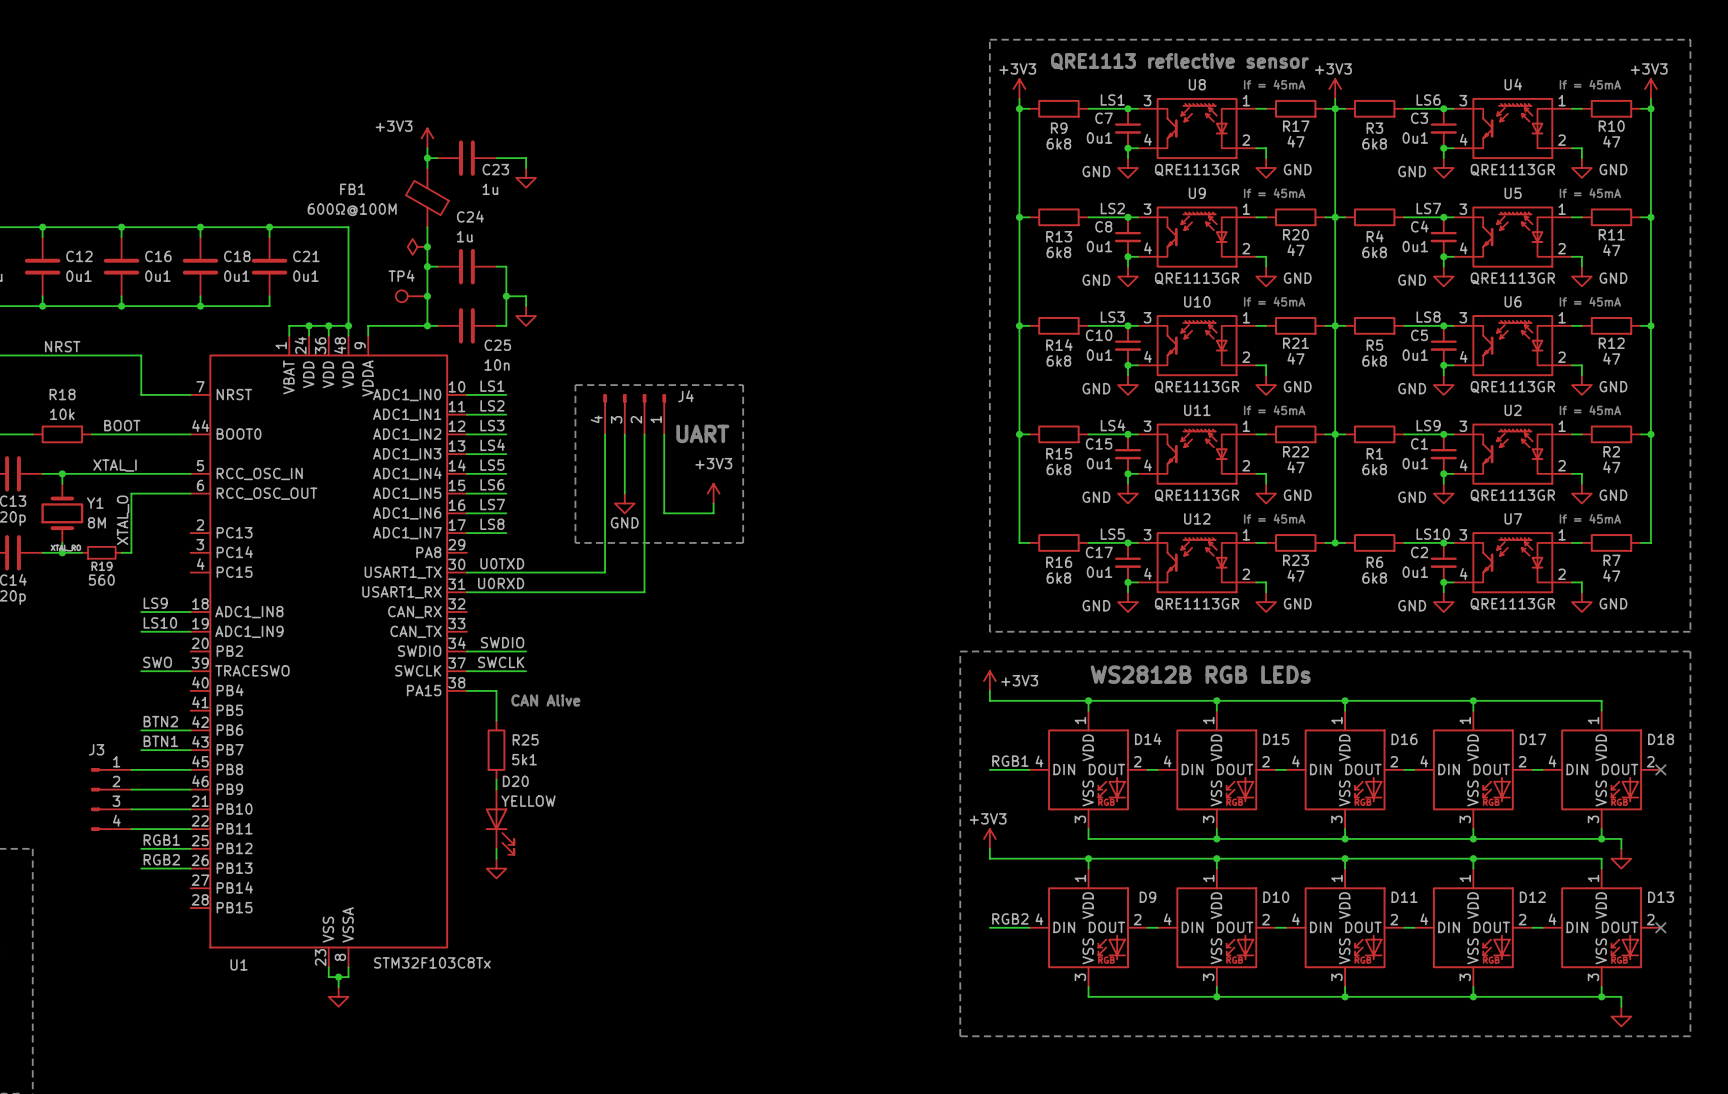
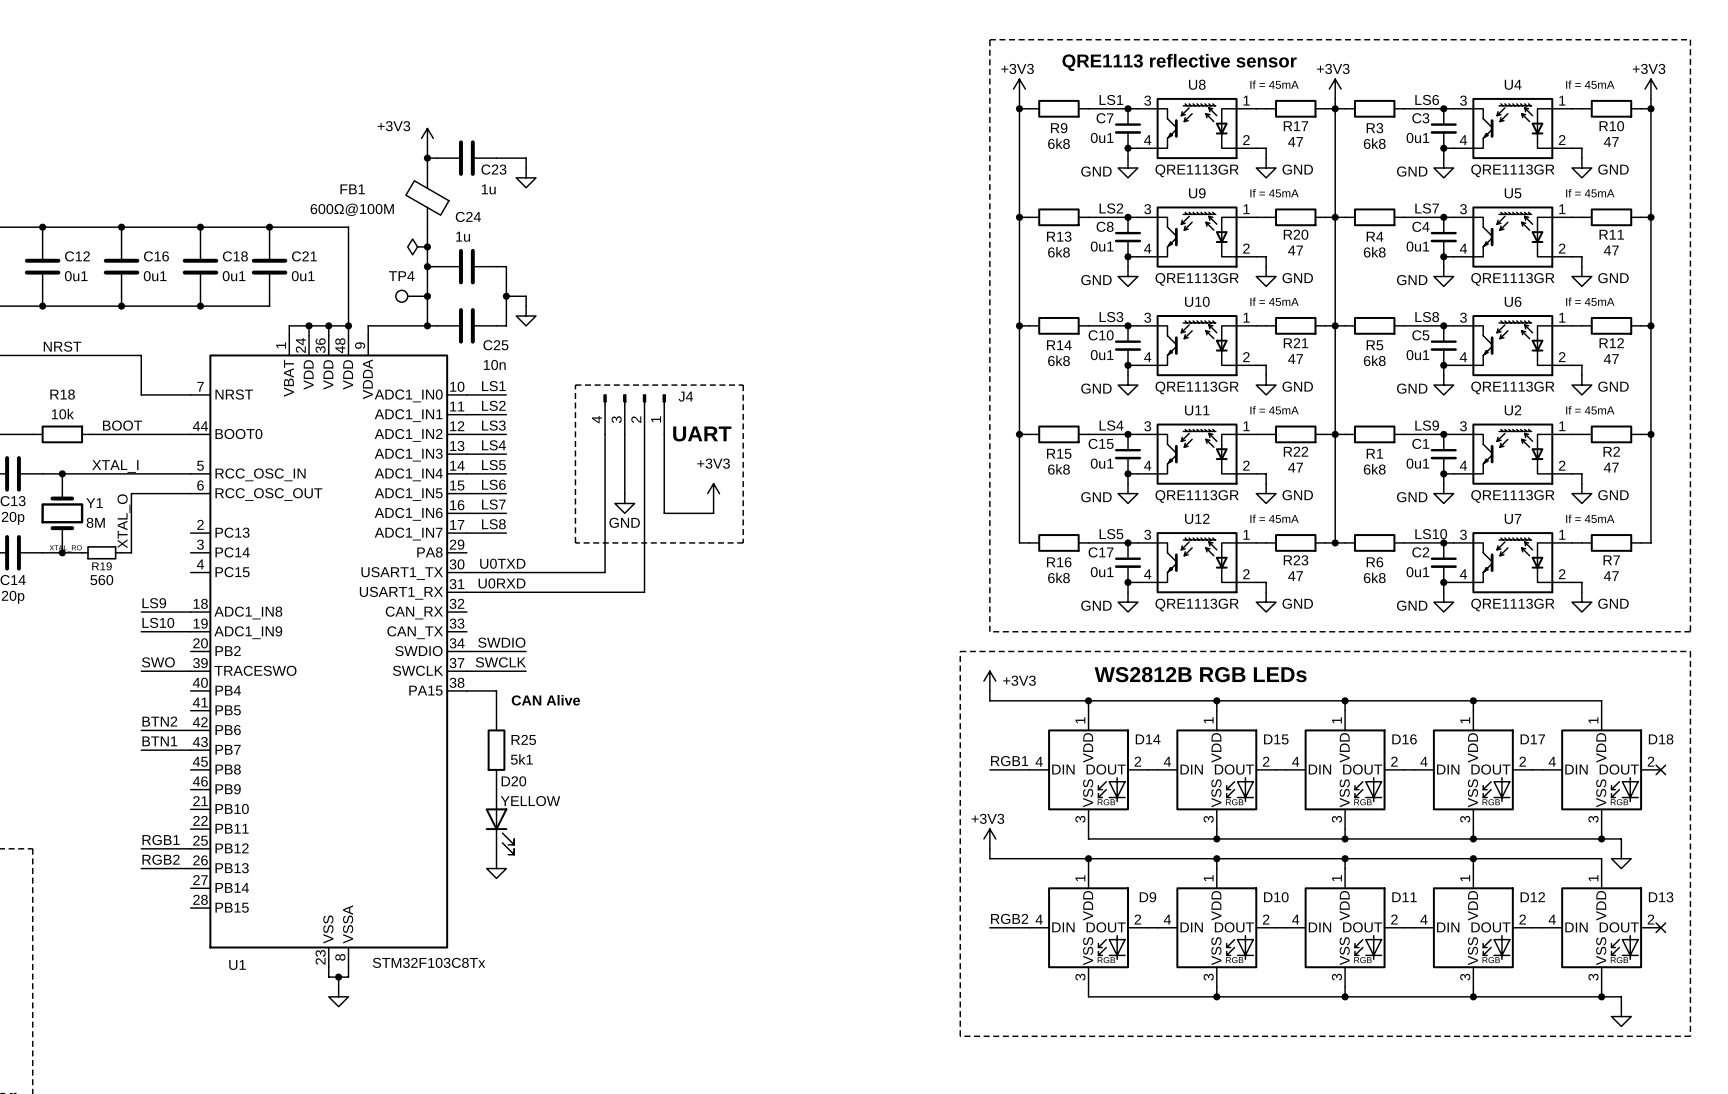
wire: (131, 769) (190, 769) -> none
wire: (131, 789) (190, 789) -> none
J3: (111, 799) -> none
wire: (131, 809) (190, 809) -> none
wire: (131, 829) (190, 829) -> none

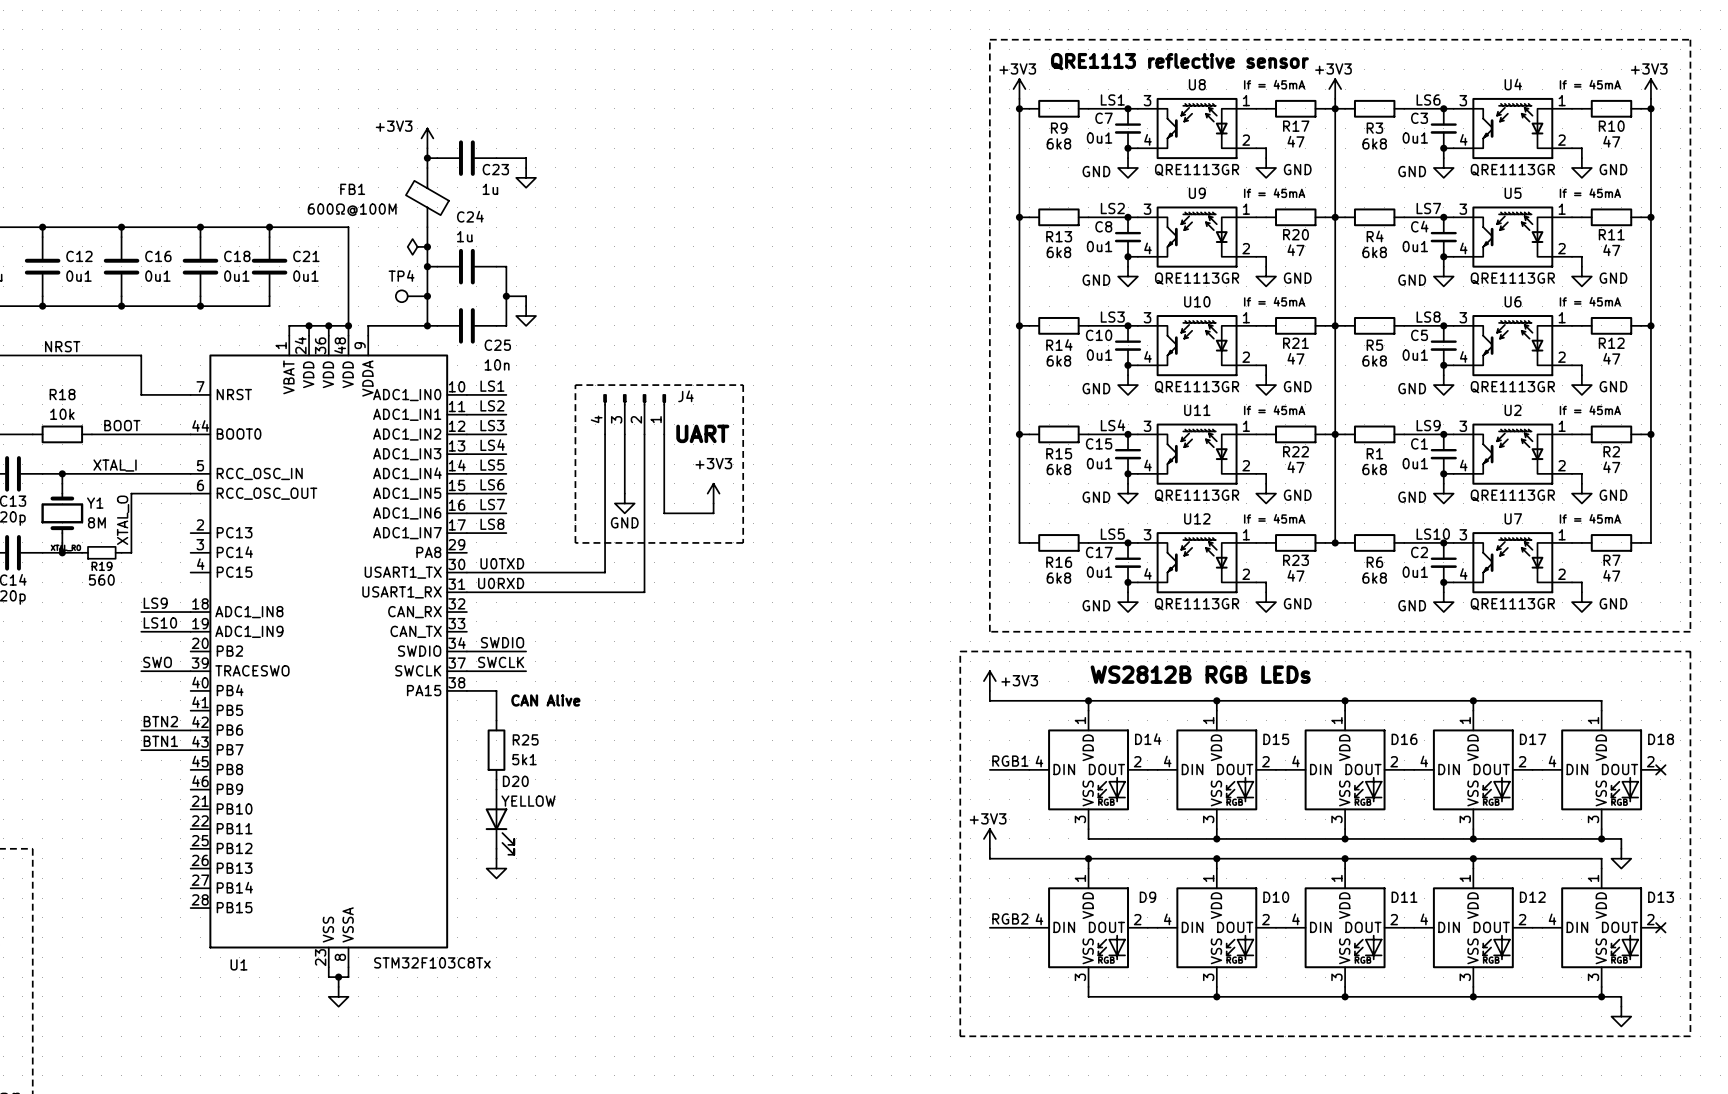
label: RGB1 (161, 840) -> none
wire: (141, 848) (190, 848) -> none
label: RGB2 (161, 859) -> none
wire: (141, 868) (190, 868) -> none

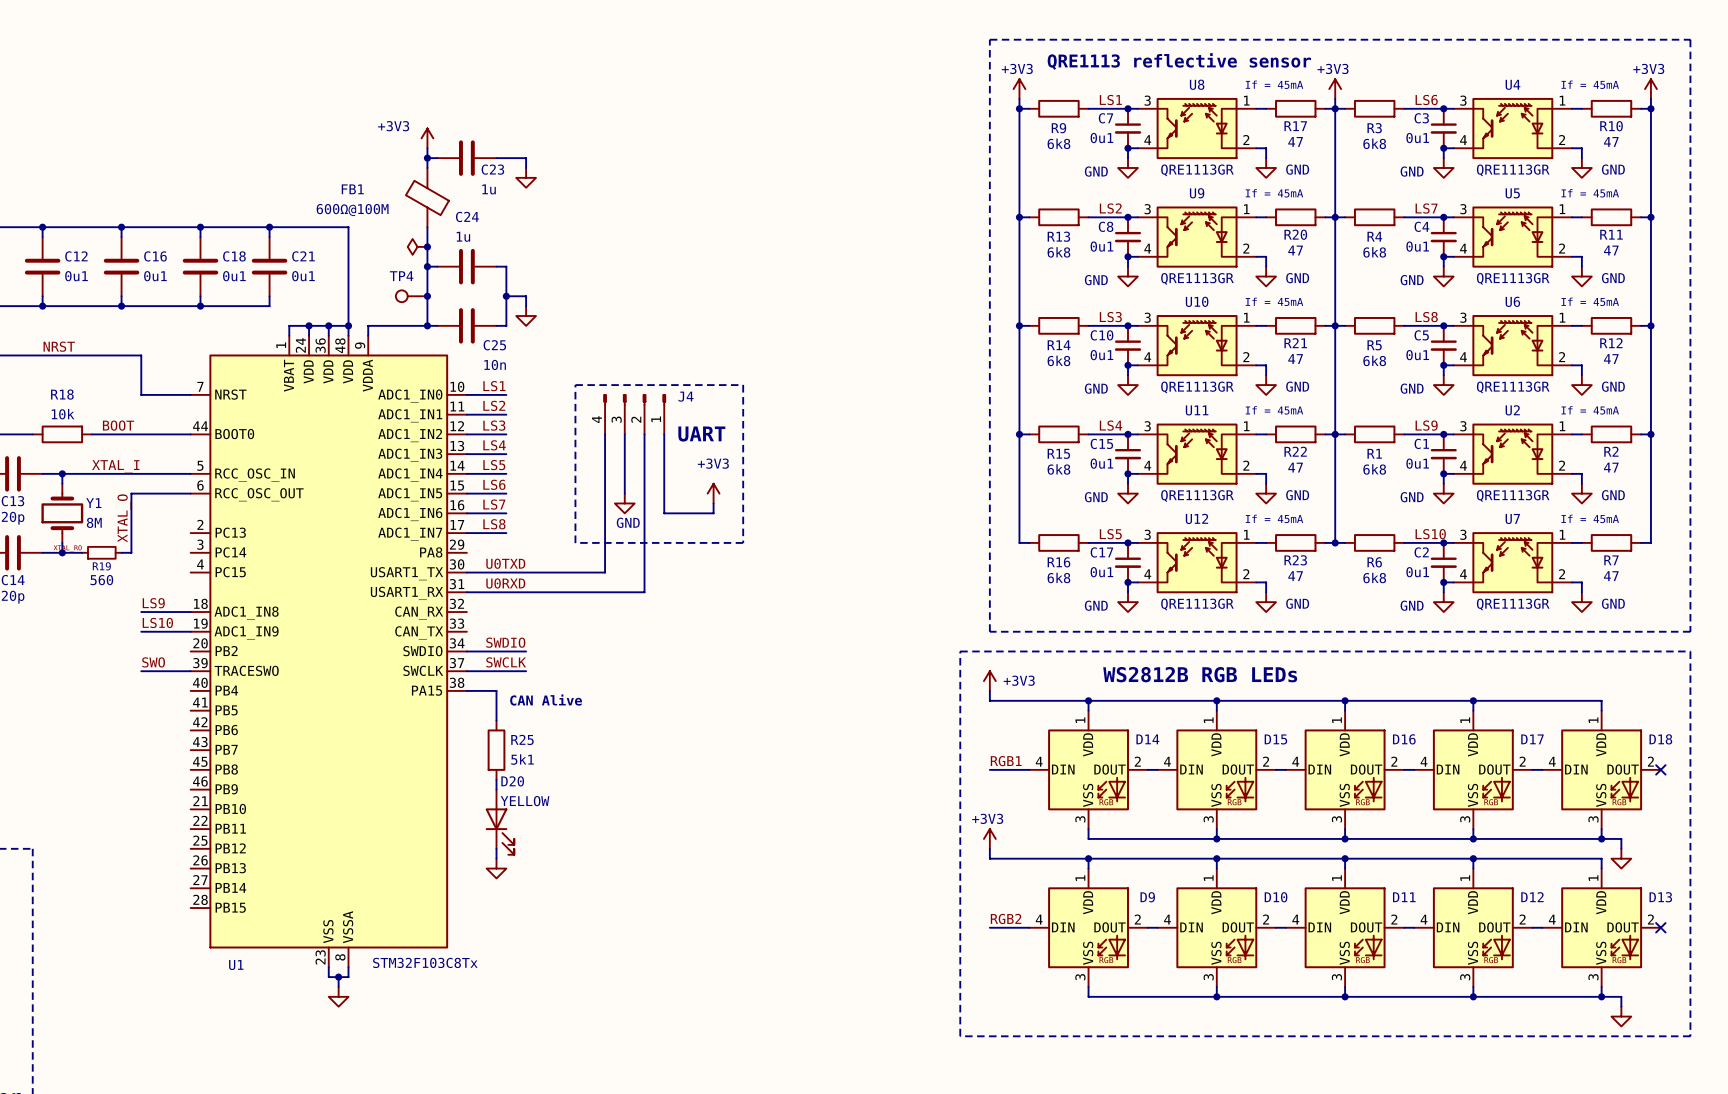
label: BTN2 (160, 721) -> none
wire: (141, 730) (190, 730) -> none
label: BTN1 (160, 741) -> none
wire: (141, 750) (190, 750) -> none

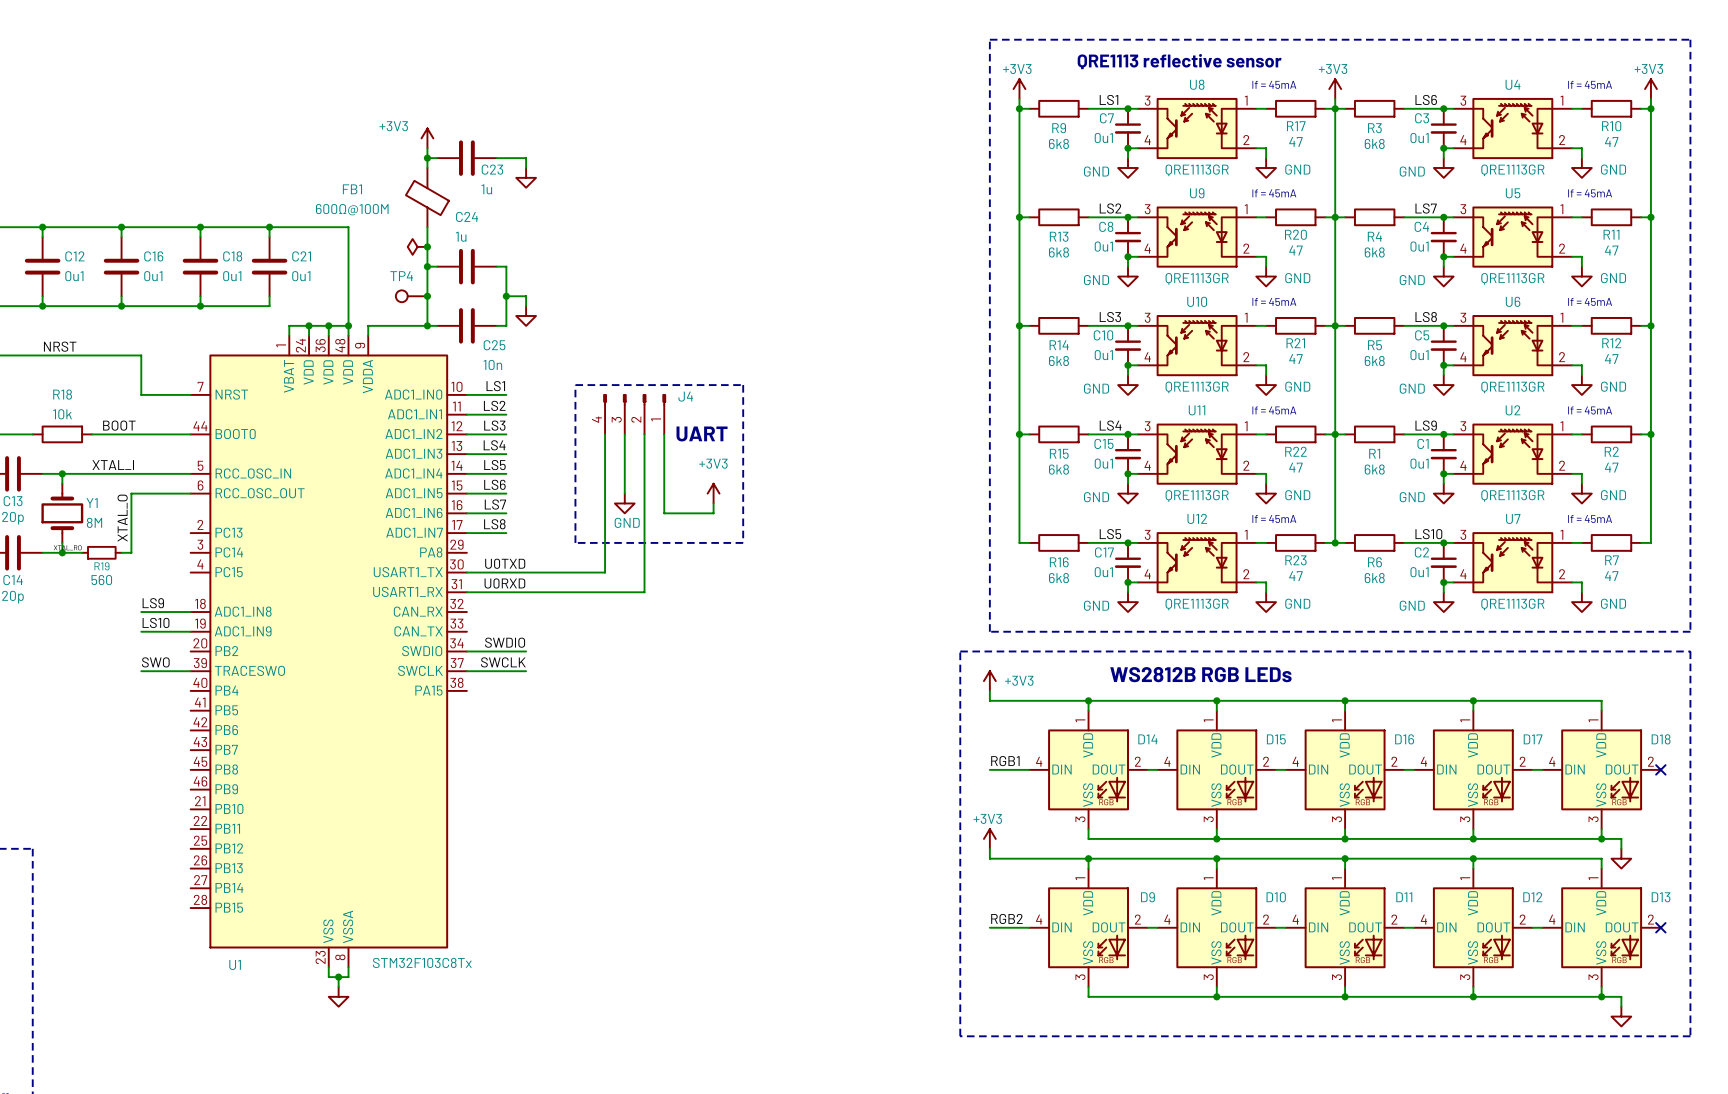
wire: (466, 690) (496, 690) (496, 720) -> none
text: CAN Alive (546, 700) -> none
R25: 5k1 (496, 750) -> none
wire: (496, 779) (496, 789) -> none
D20: YELLOW (499, 822) -> none
wire: (496, 848) (496, 858) -> none
power symbol: (496, 868) -> none

